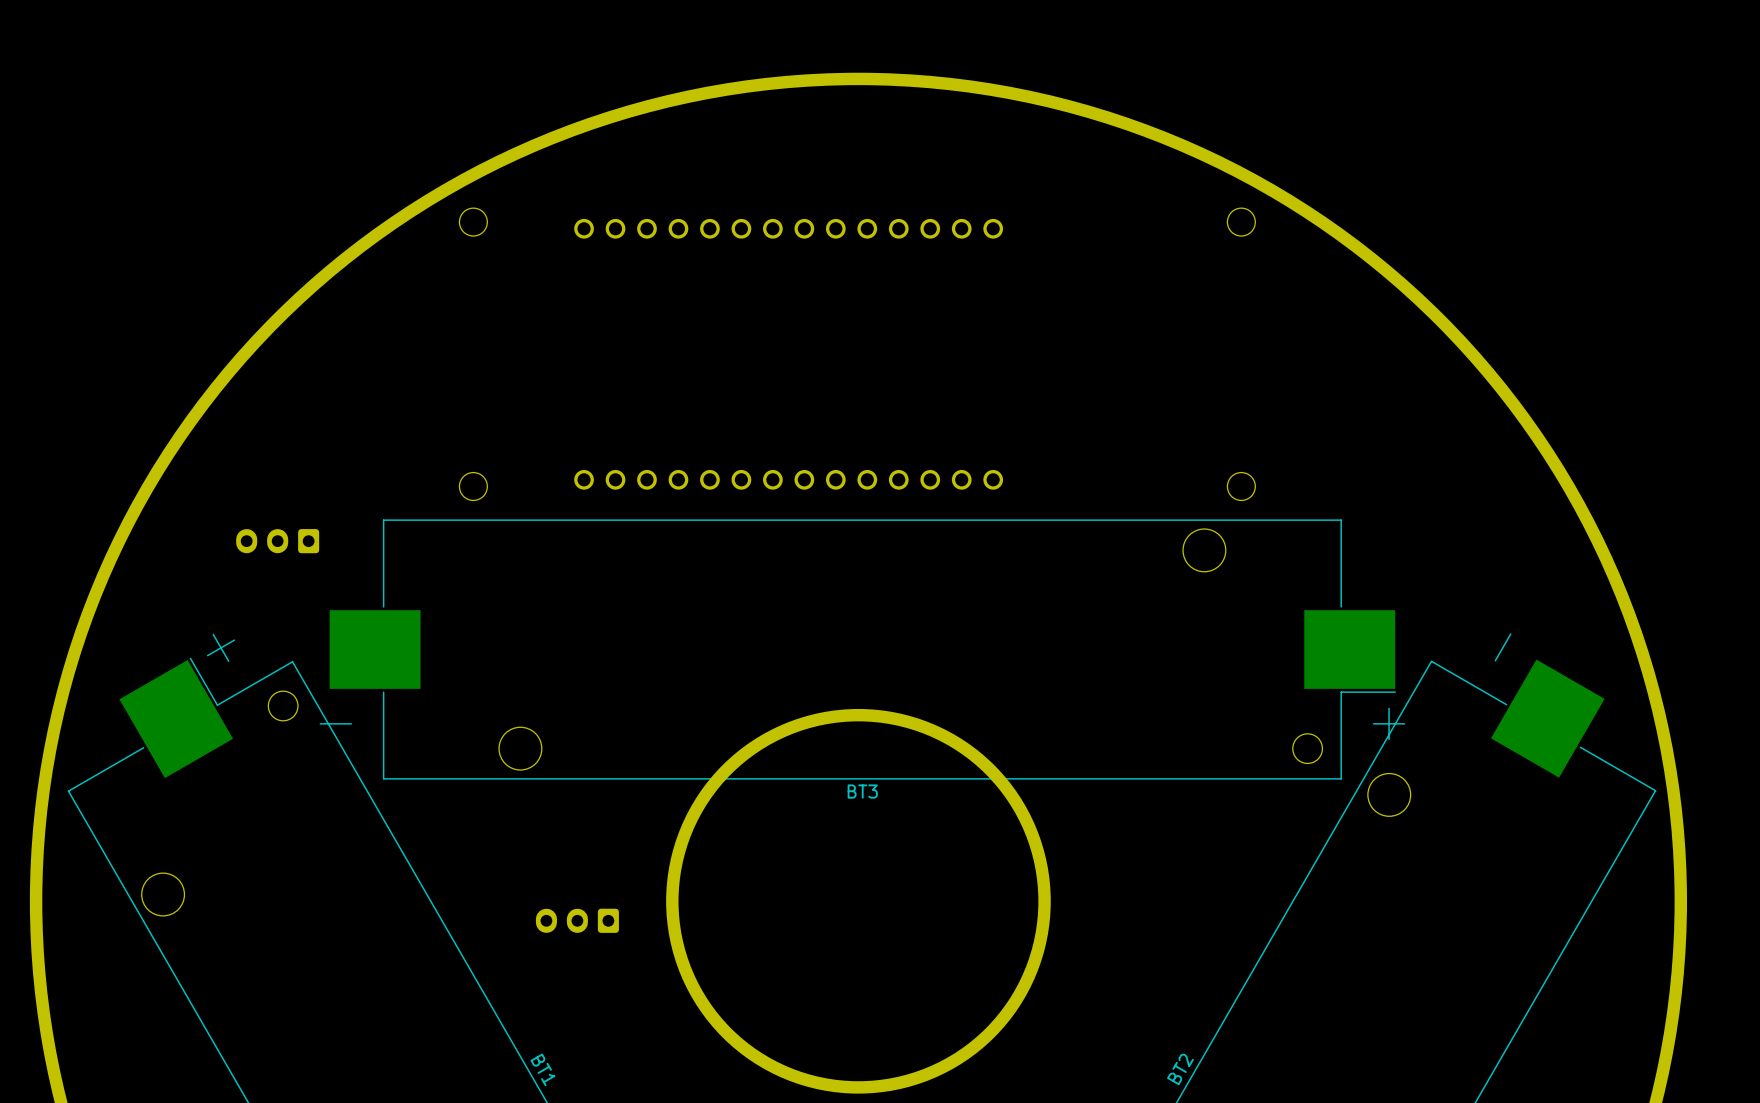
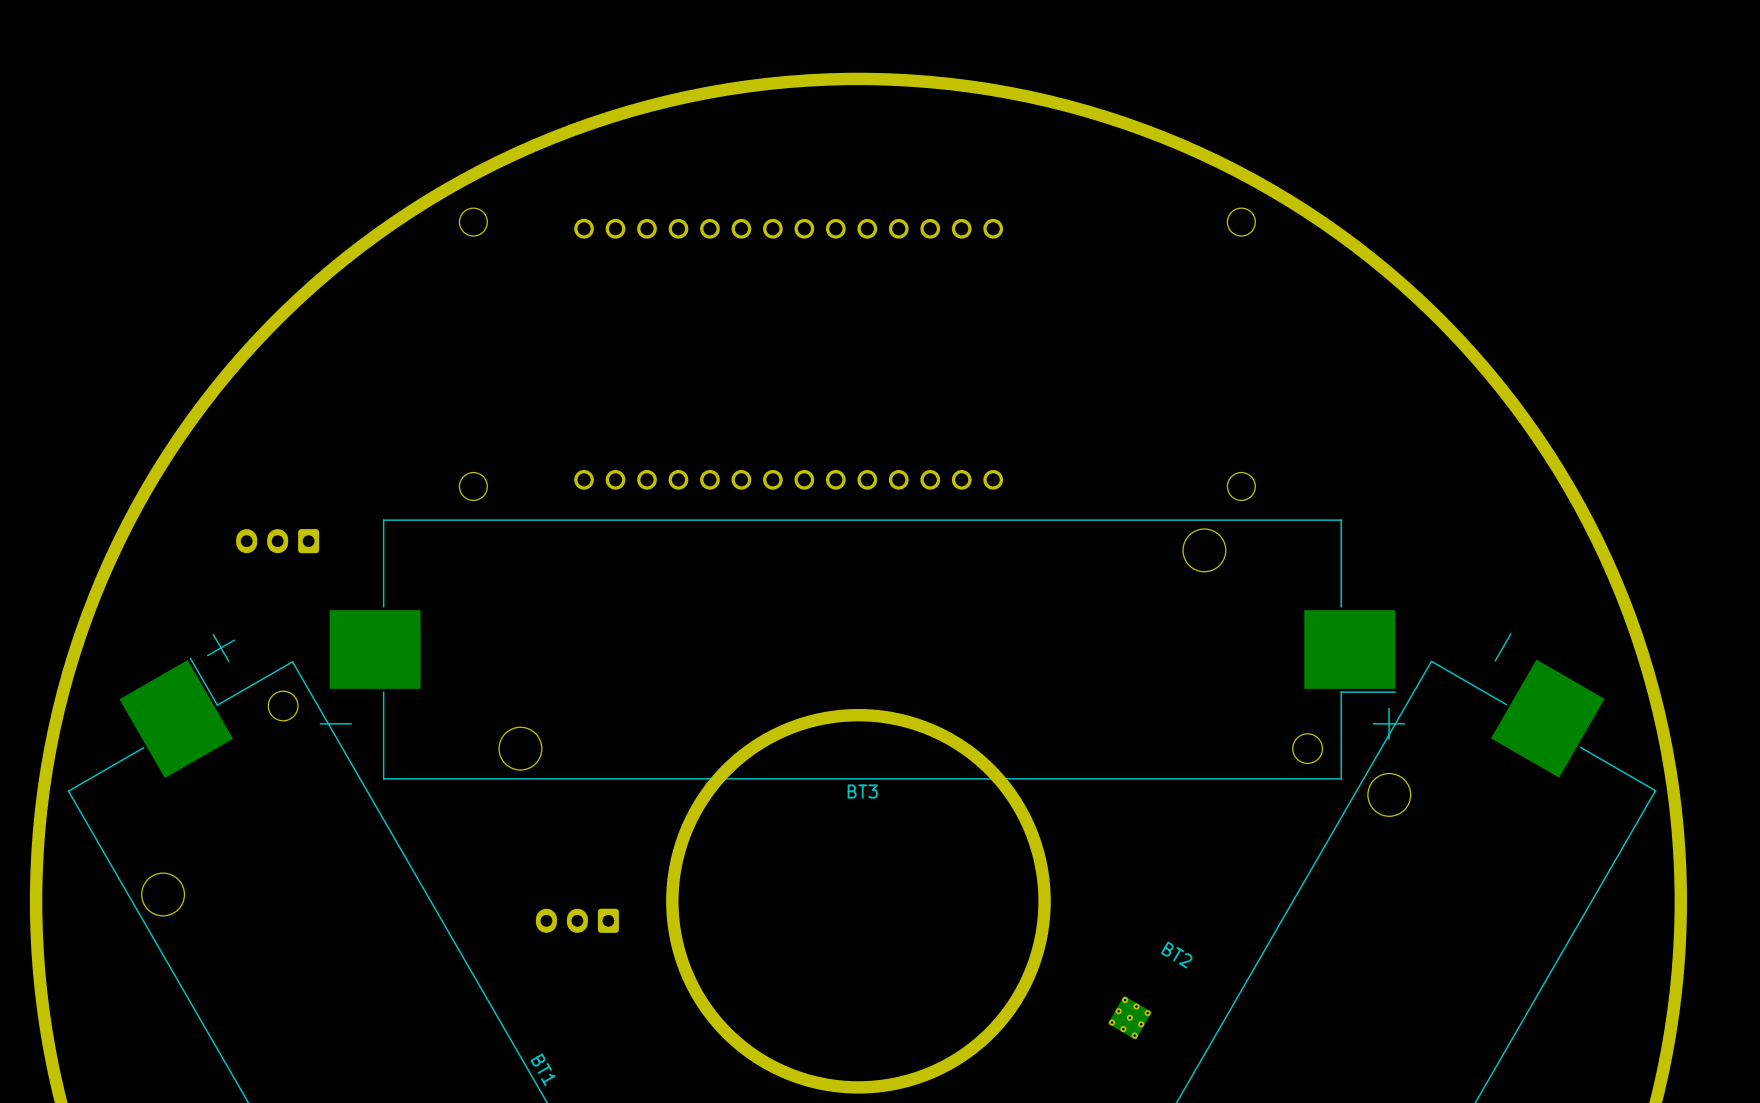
part: none -> (1129, 1017)
BT2 name rotation: 0° (1180, 1069) -> 90° clockwise (1176, 955)
BT2 name position: BT2 (1180, 1069) -> BT2 (1176, 955)

